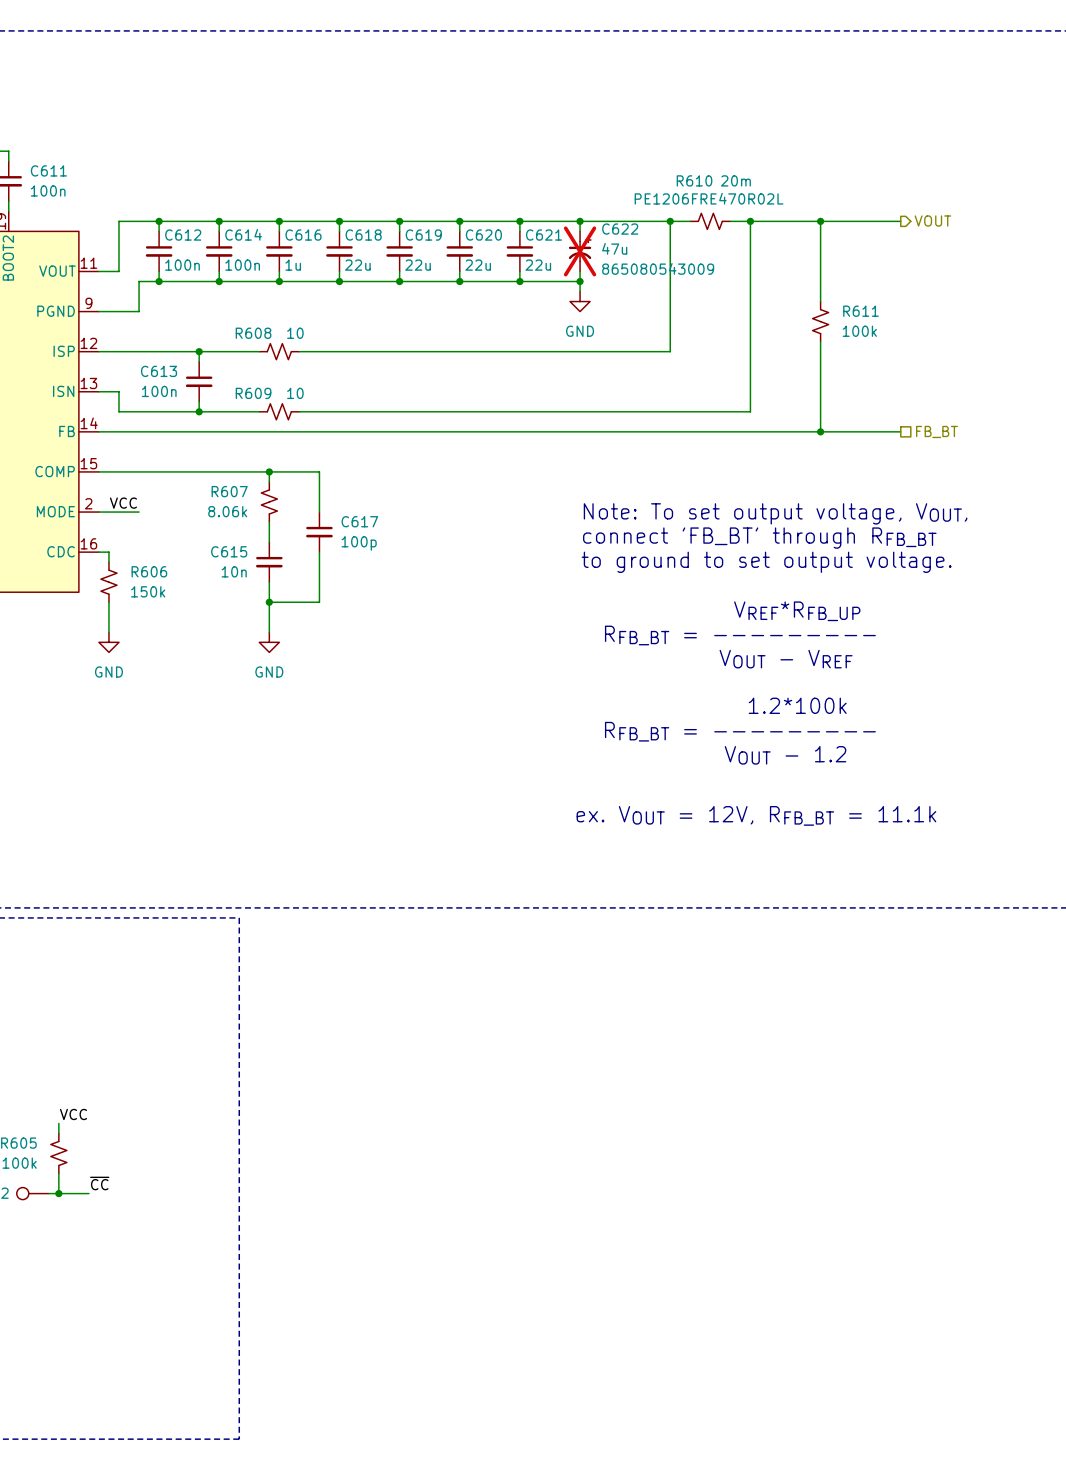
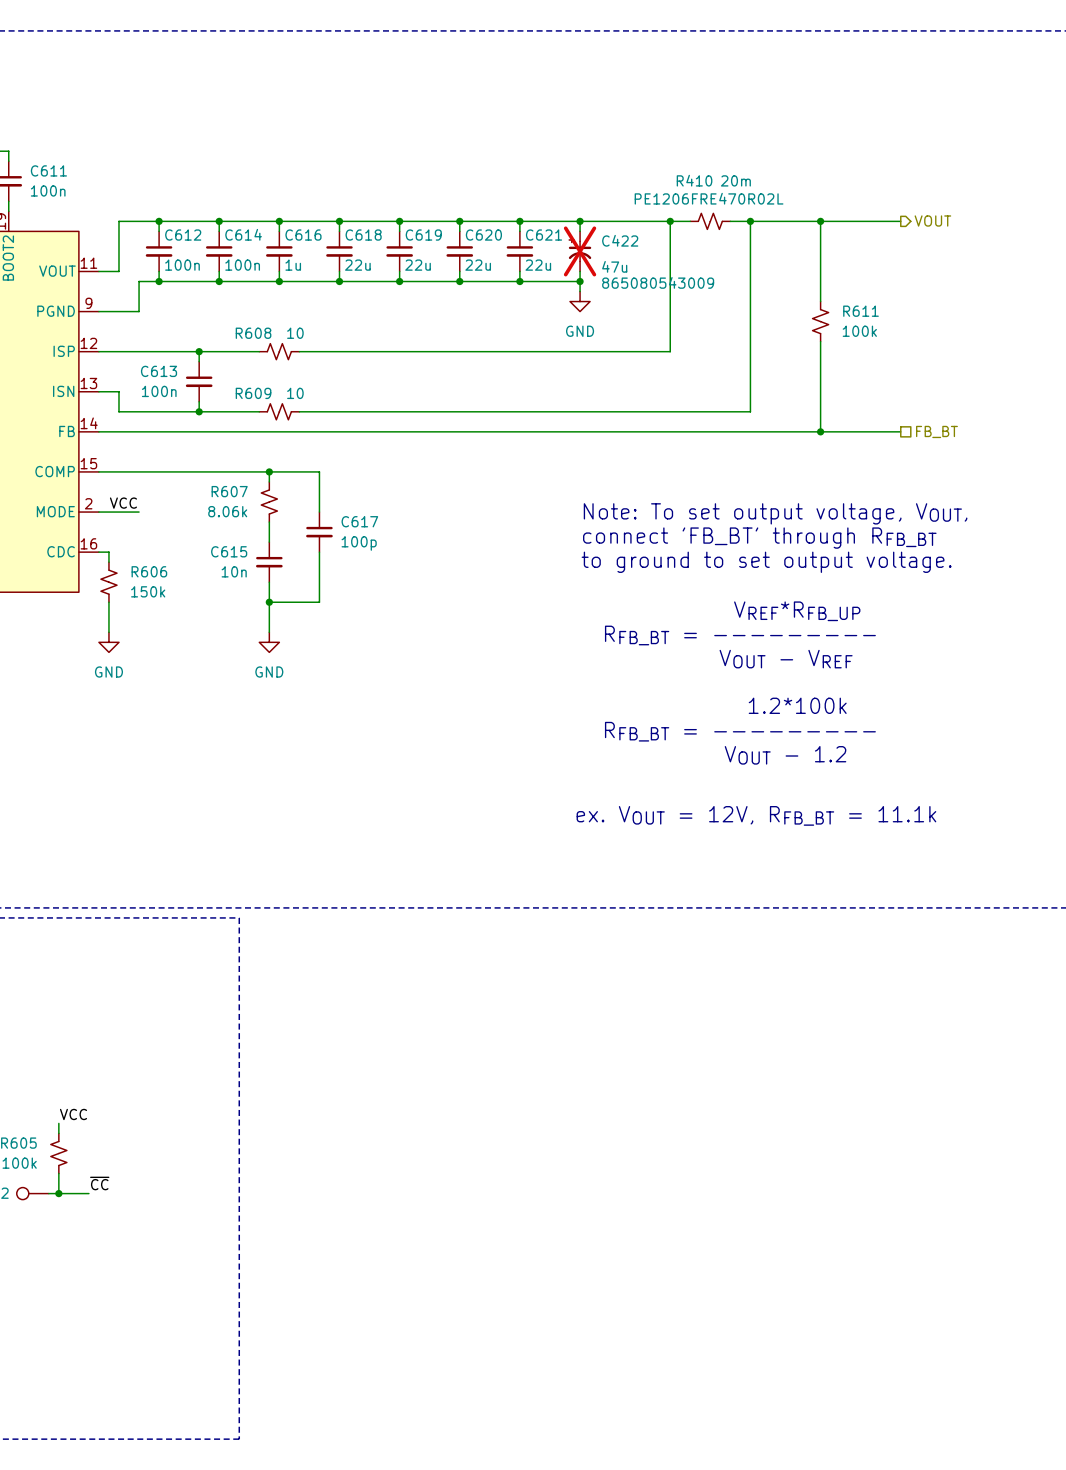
R610 name: R610 (694, 180) -> R410 (694, 180)
C622: 47u (580, 251) -> none
C422: none -> 47u (580, 251)

